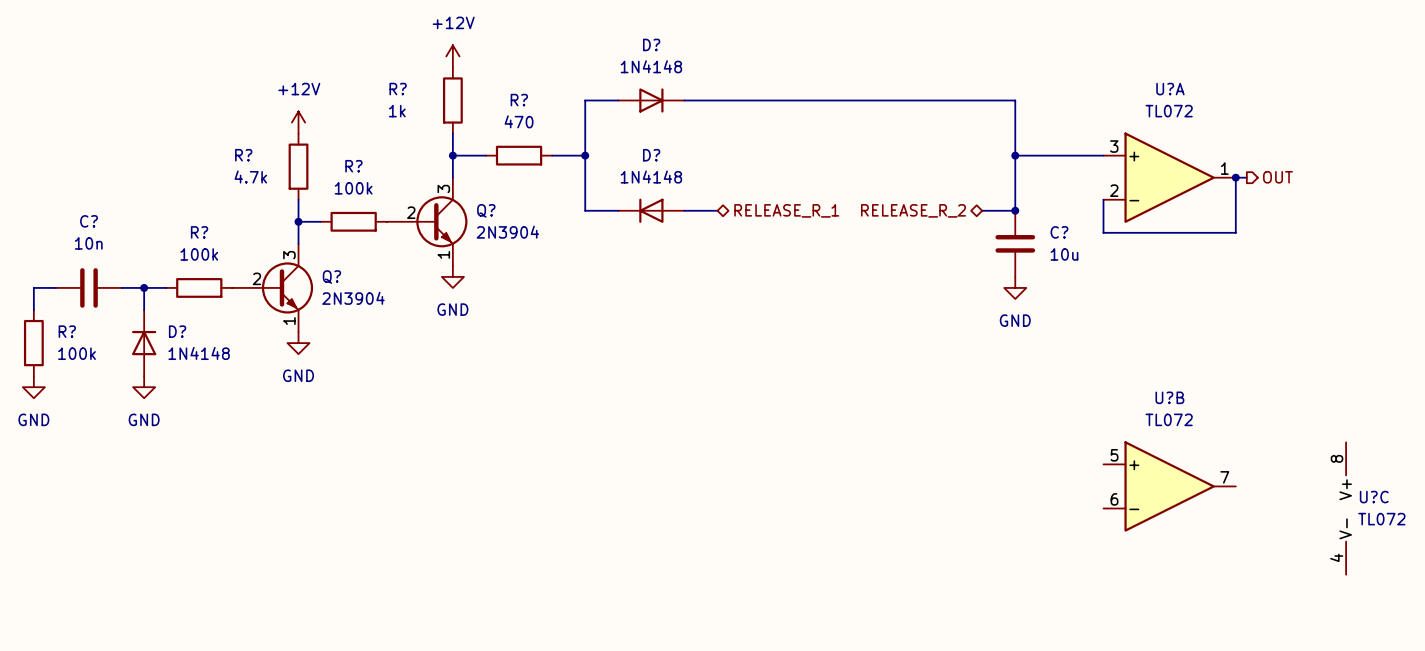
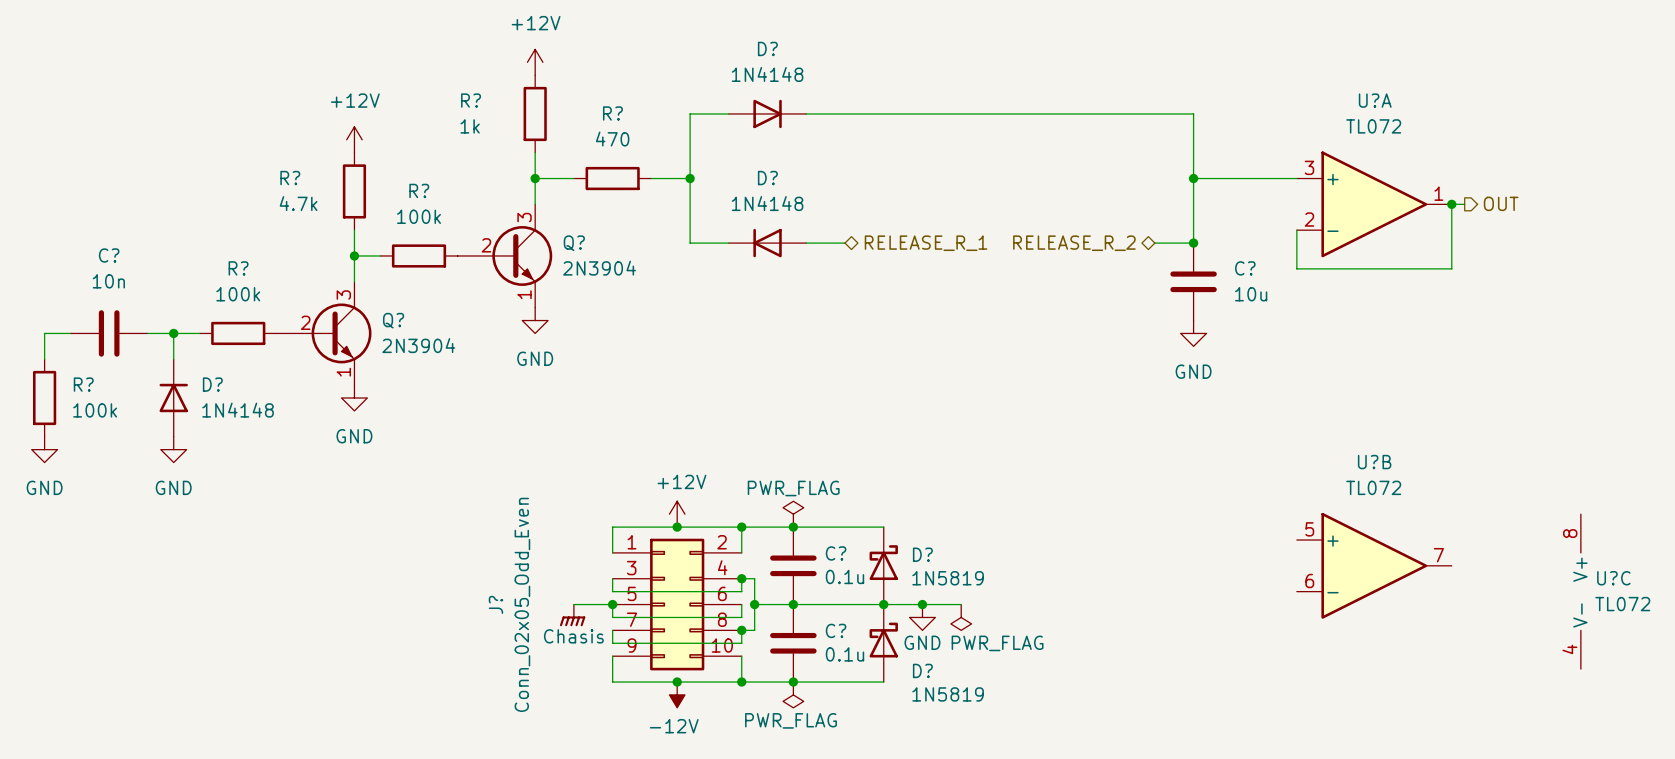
power symbol: none -> +12V (677, 514)
power symbol: none -> PWR_FLAG (793, 514)
junction: none -> (677, 527)
wire: none -> (741, 527) (741, 552)
junction: none -> (741, 527)
junction: none -> (793, 527)
wire: none -> (883, 527) (612, 527) (612, 552)
C?: none -> 0.1u (793, 565)
D?: none -> 1N5819 (883, 565)
wire: none -> (612, 578) (612, 591) (741, 591) (741, 578) (754, 578) (754, 630) (741, 630) (741, 643) (612, 643) (612, 630)
junction: none -> (741, 578)
wire: none -> (573, 604) (612, 604) (612, 617) (741, 617) (741, 604)
junction: none -> (612, 604)
J?: none -> Conn_02x05_Odd_Even (677, 604)
wire: none -> (754, 604) (961, 604)
junction: none -> (754, 604)
junction: none -> (793, 604)
junction: none -> (883, 604)
junction: none -> (922, 604)
power symbol: none -> Chasis (572, 615)
power symbol: none -> GND (922, 617)
power symbol: none -> PWR_FLAG (961, 617)
junction: none -> (741, 630)
C?: none -> 0.1u (793, 643)
D?: none -> 1N5819 (883, 643)
wire: none -> (612, 656) (612, 682) (883, 682)
wire: none -> (741, 656) (741, 682)
junction: none -> (677, 682)
junction: none -> (741, 682)
junction: none -> (793, 682)
power symbol: none -> -12V (677, 694)
power symbol: none -> PWR_FLAG (793, 694)

